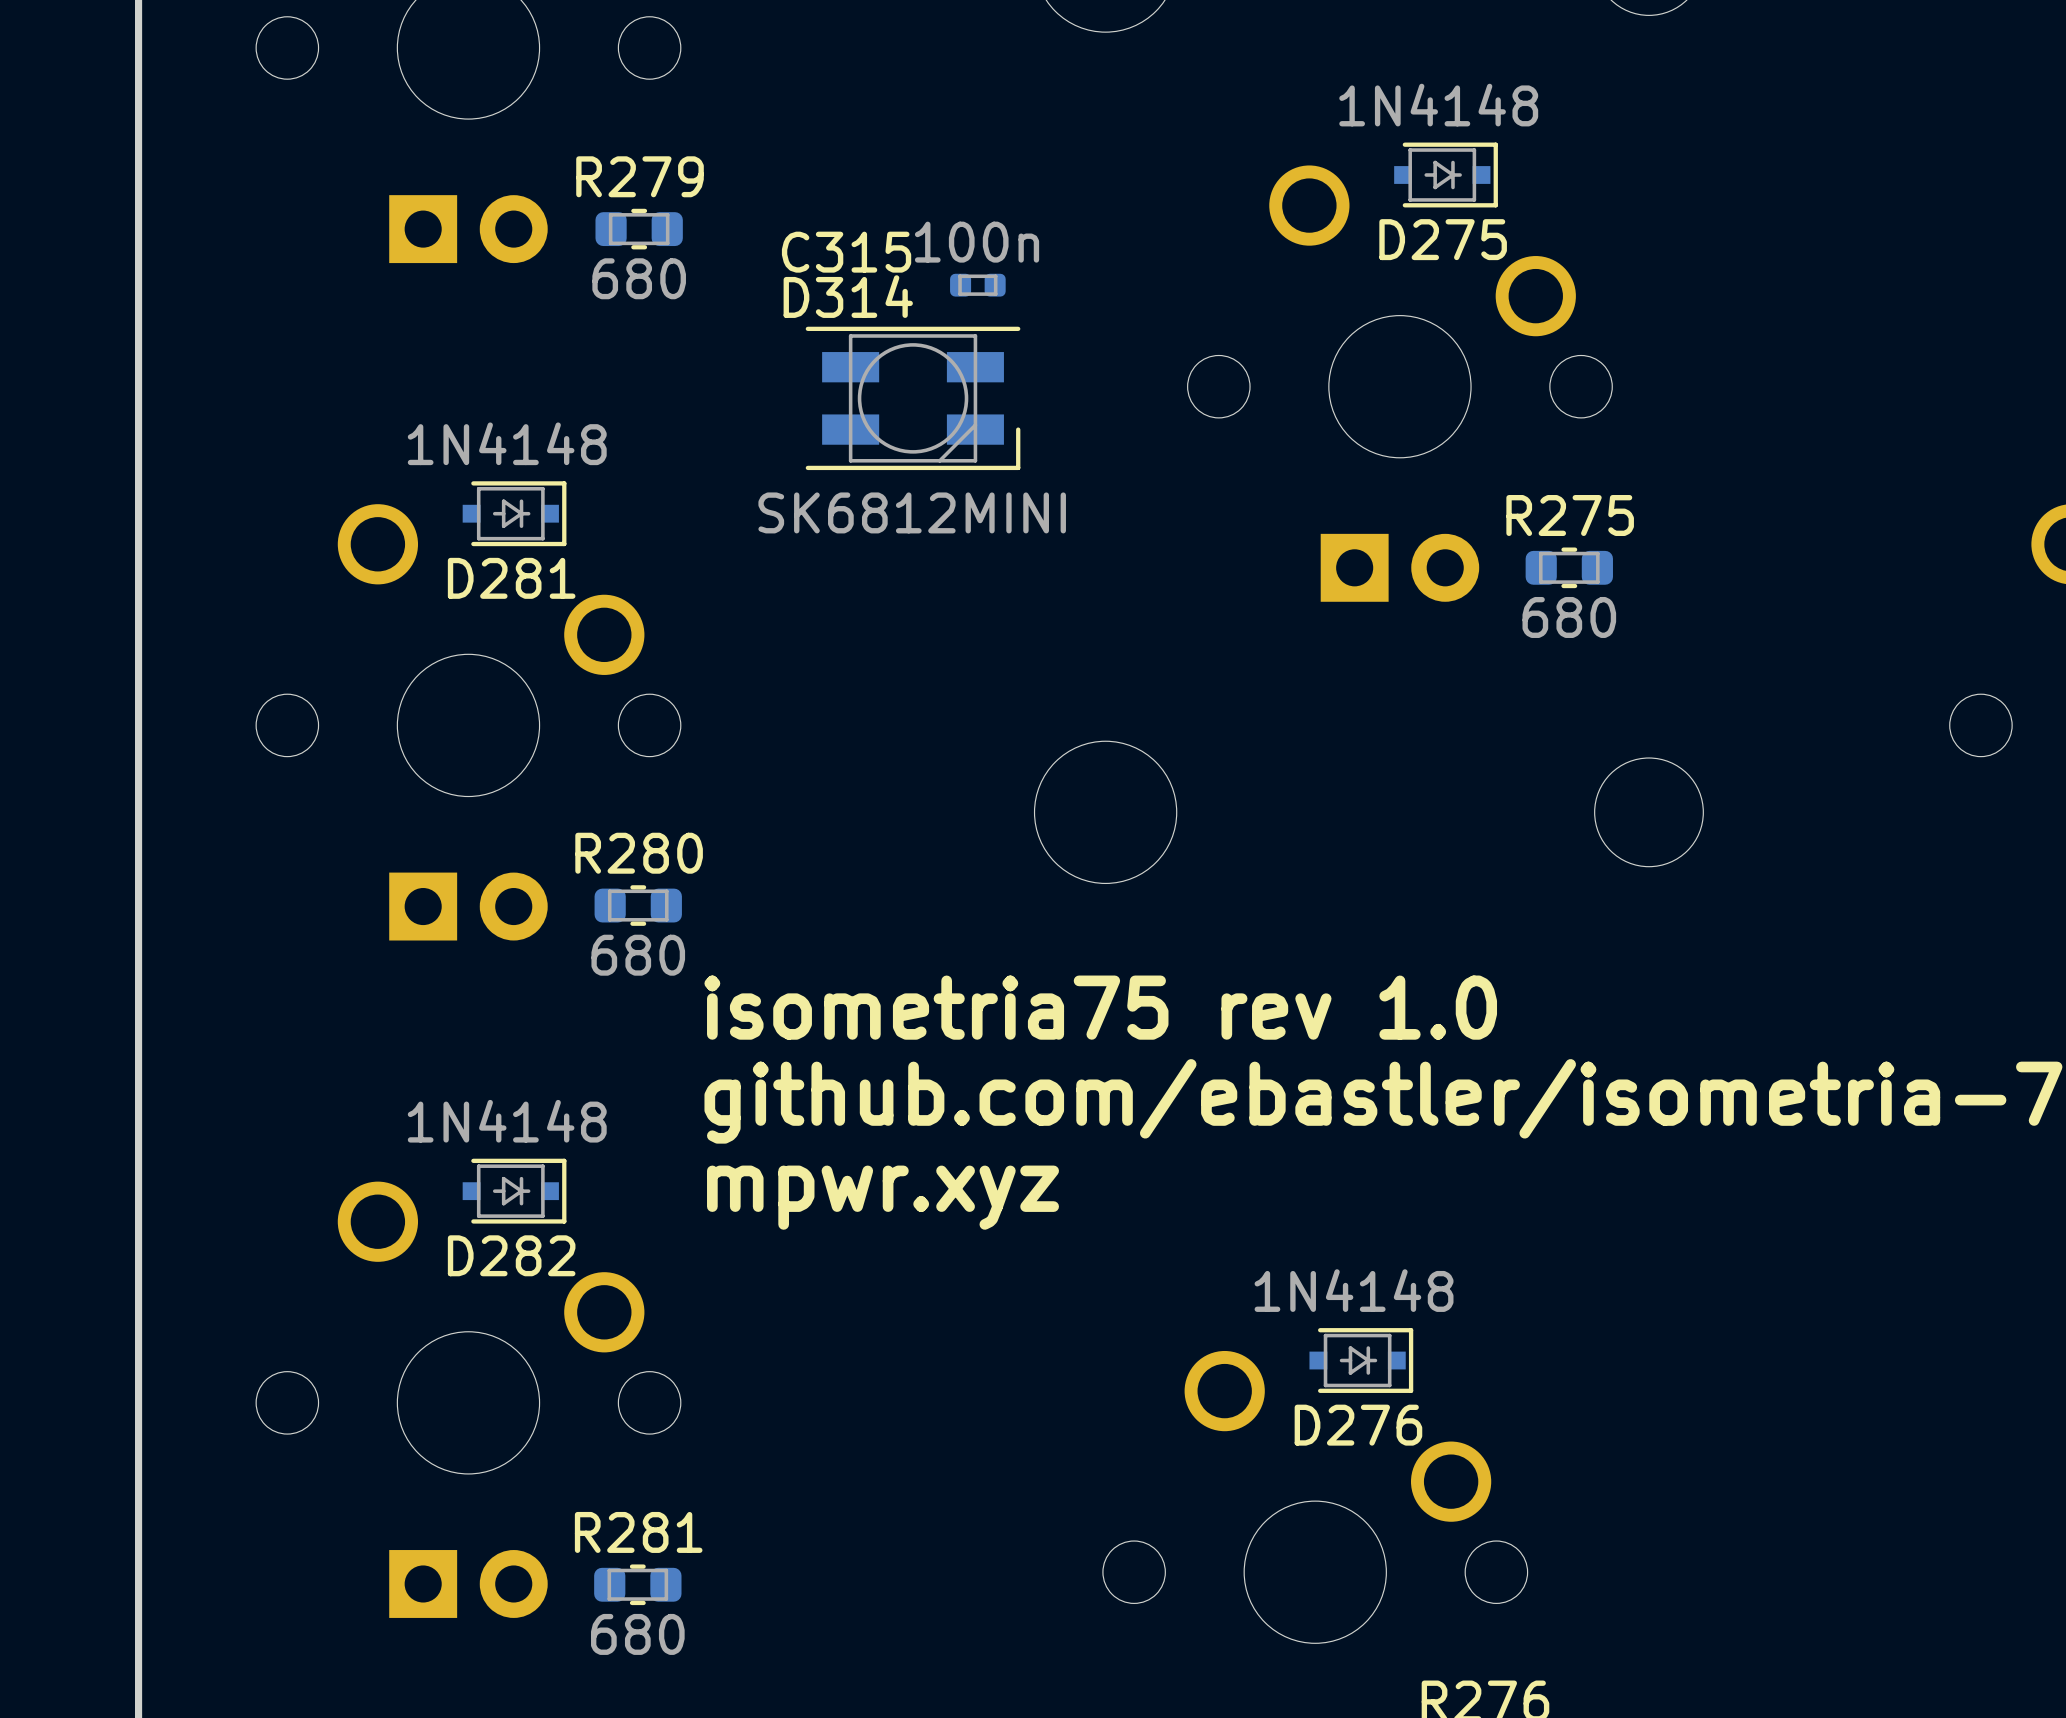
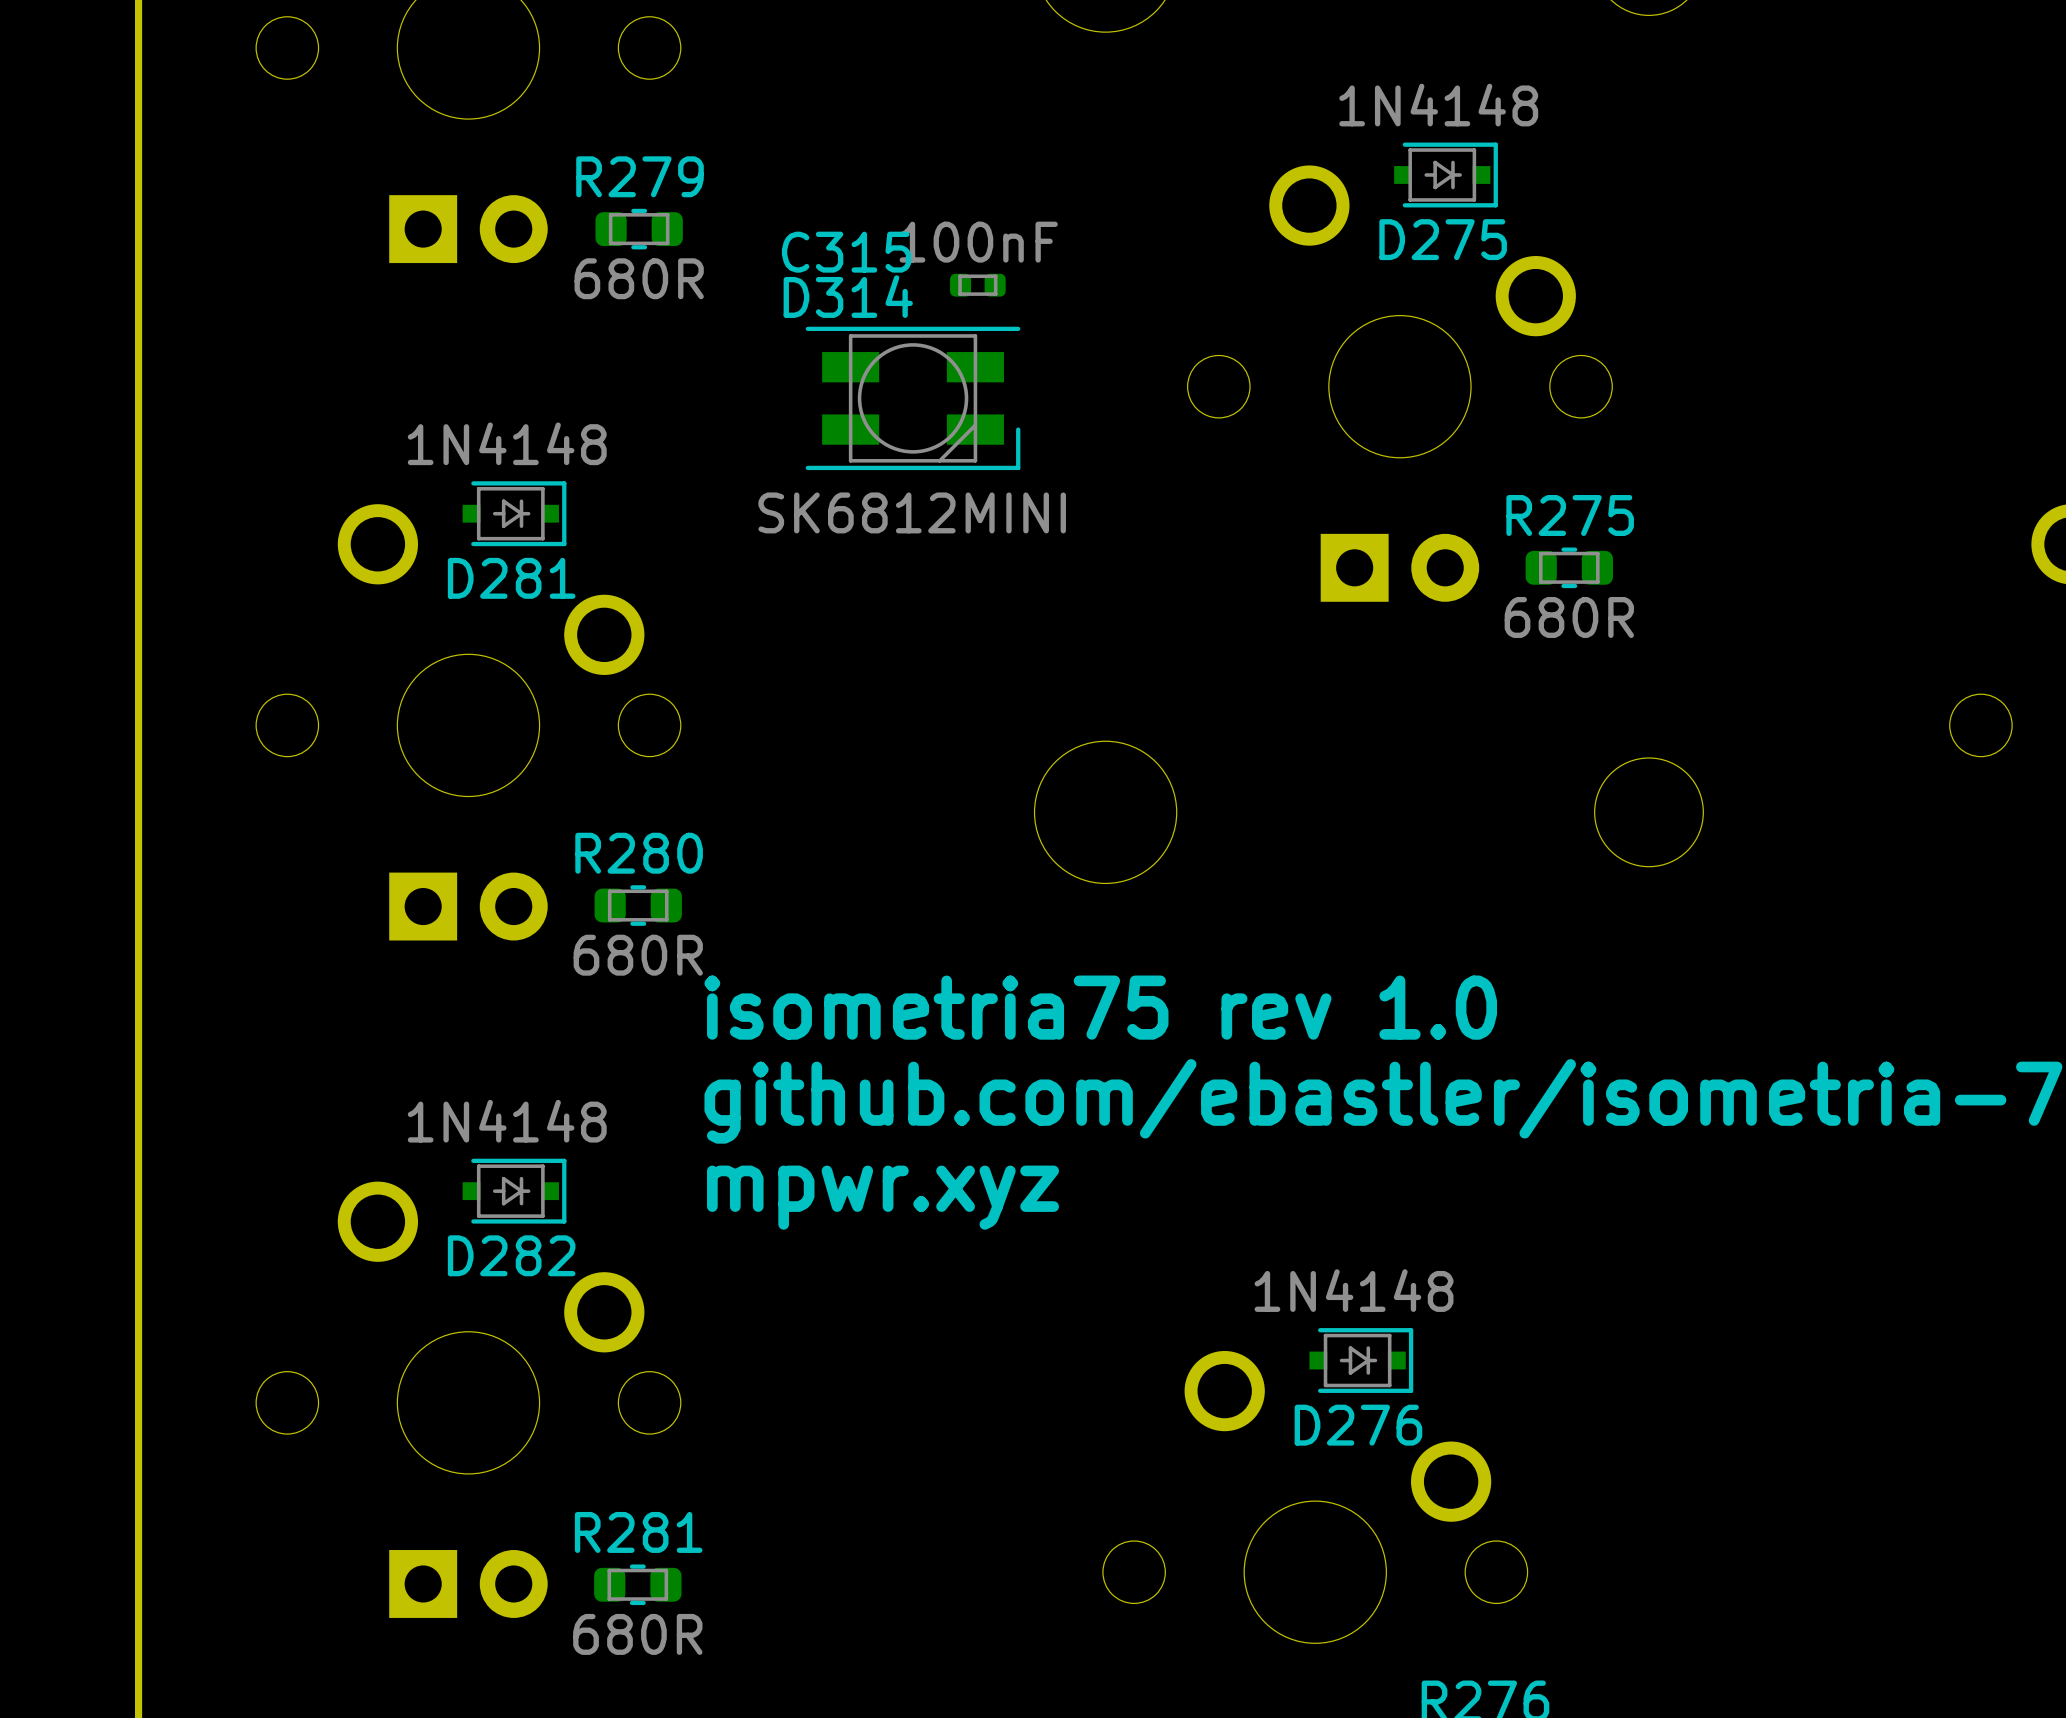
C315 value: 100n (977, 242) -> 100nF (978, 242)
R279 value: 680 (639, 278) -> 680R (639, 278)
R275 value: 680 (1569, 617) -> 680R (1569, 617)
R280 value: 680 (638, 955) -> 680R (638, 955)
R281 value: 680 (637, 1634) -> 680R (637, 1634)

